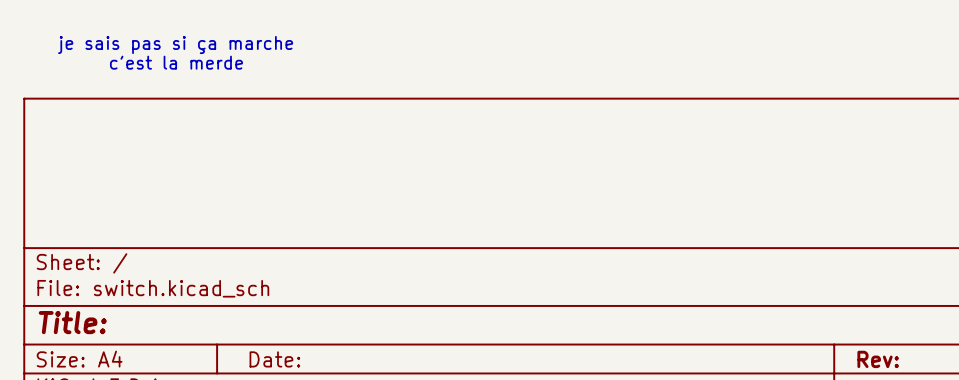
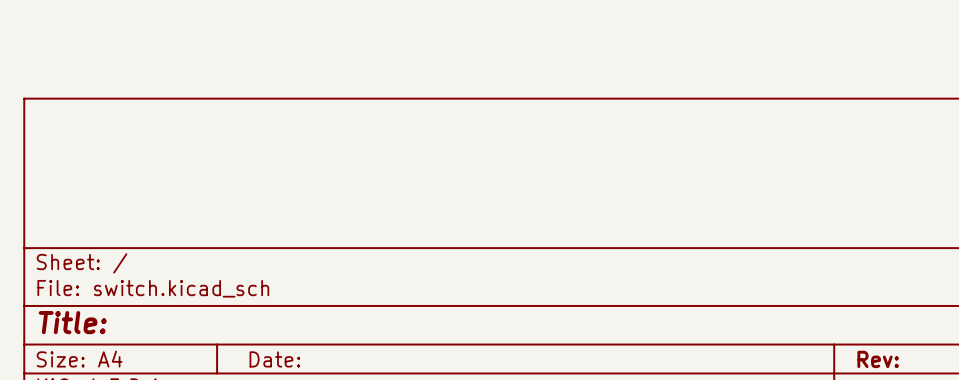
text: je sais pas si ça marche (175, 45) -> none
text: c'est la merde (176, 62) -> none

